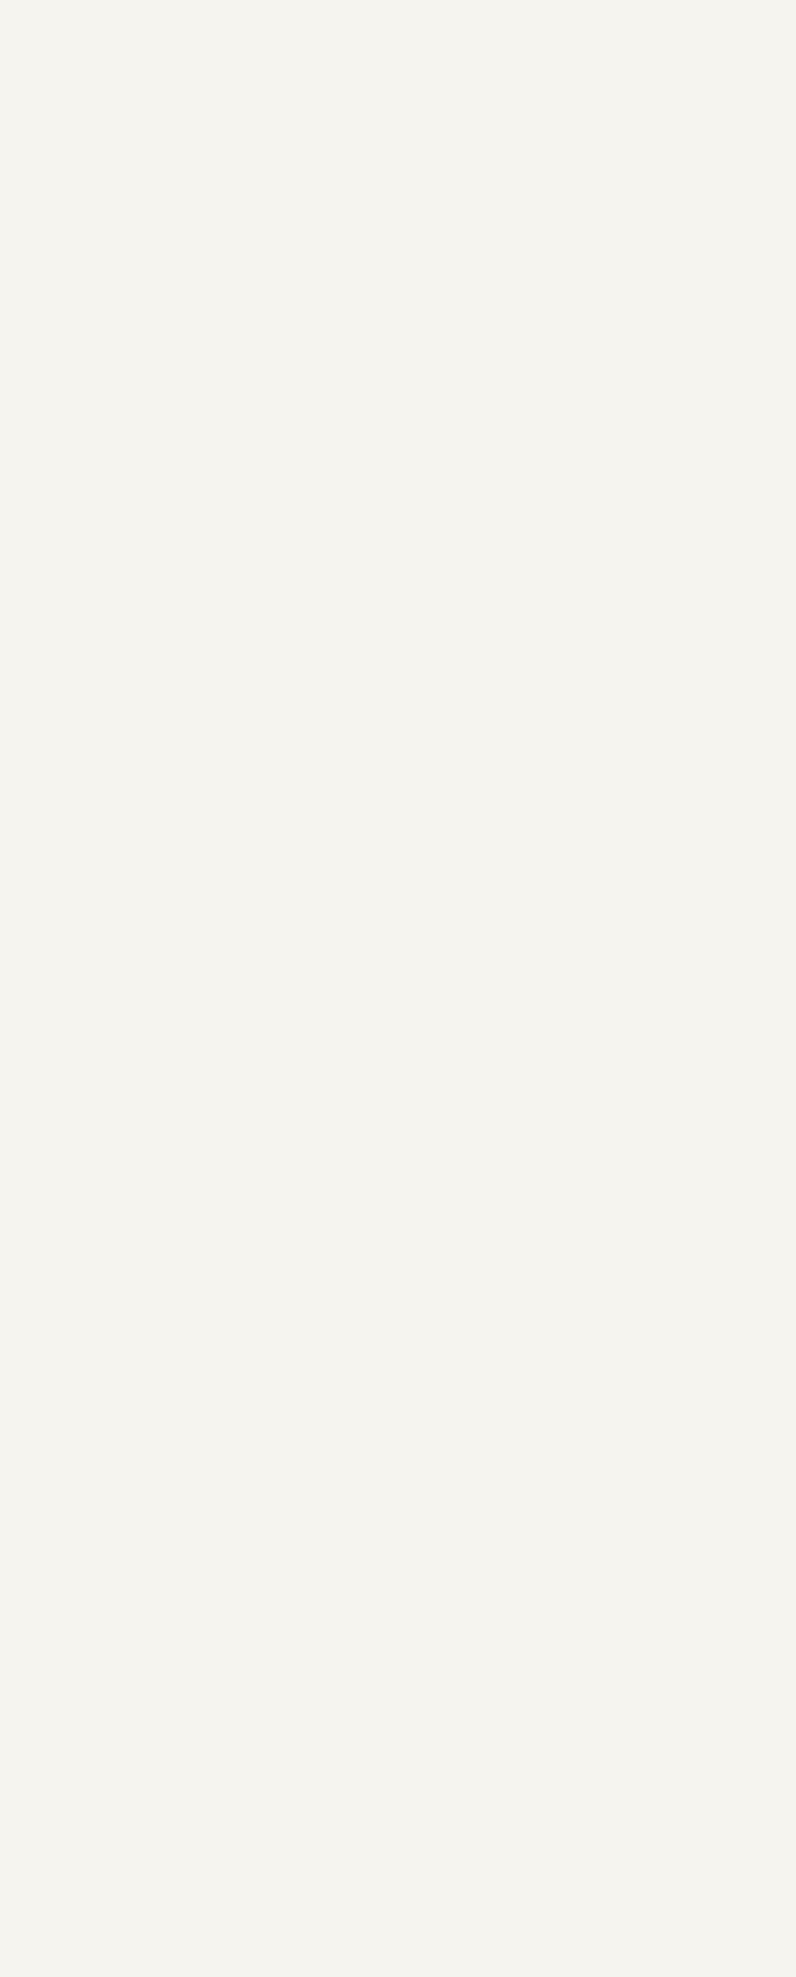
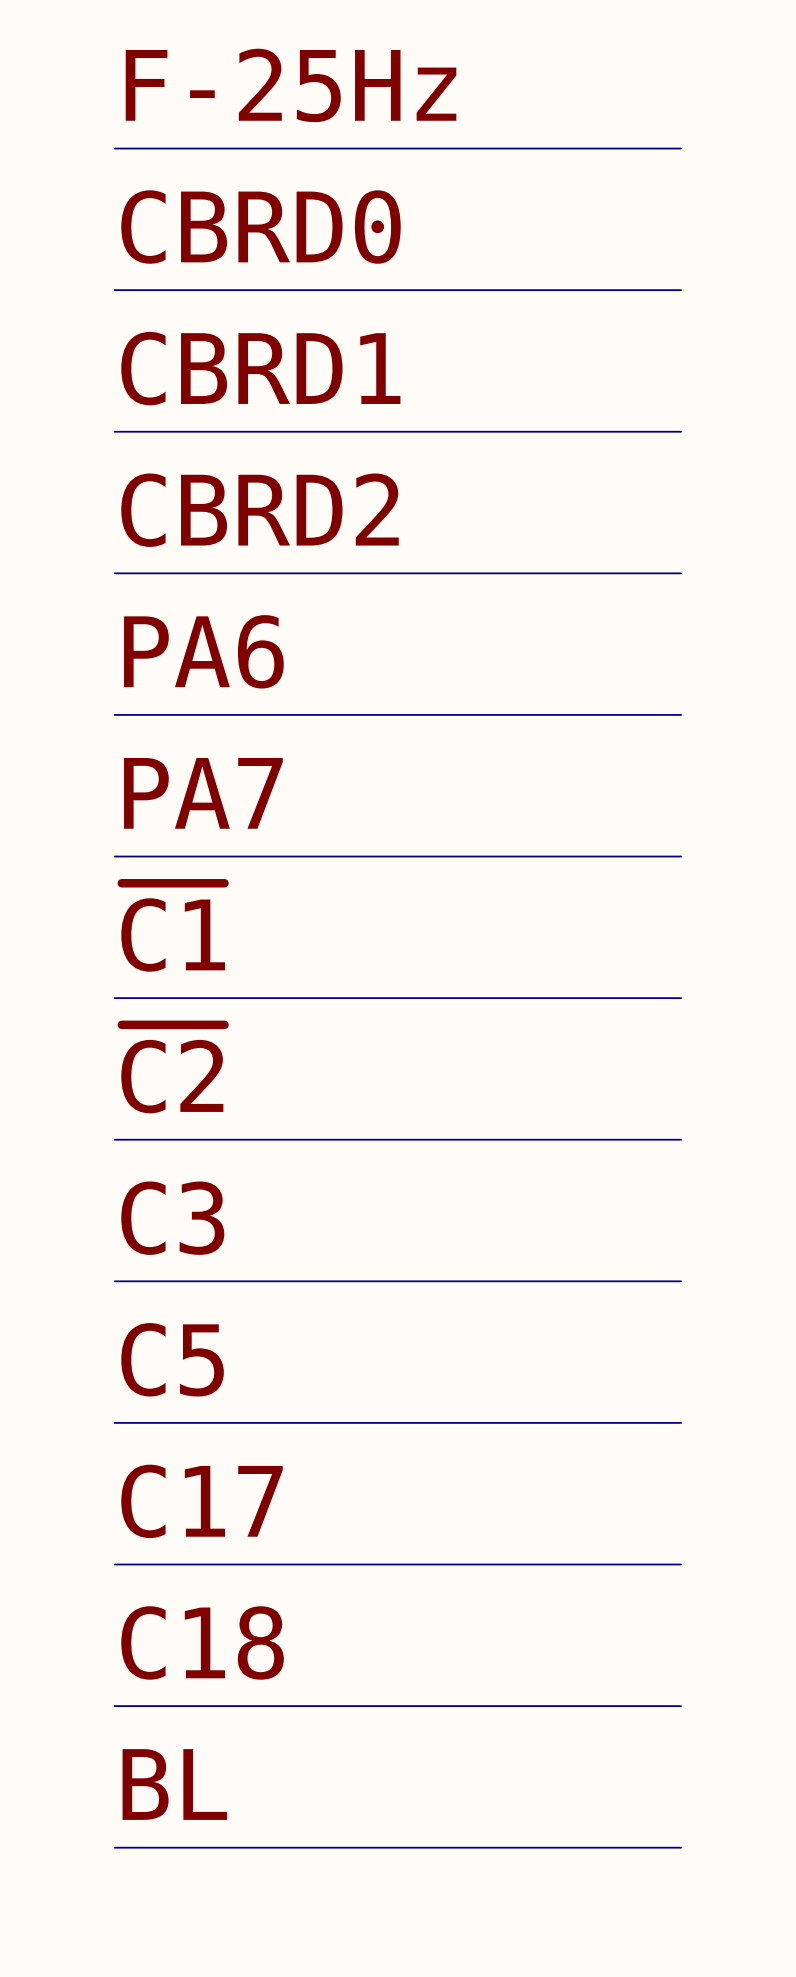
label: none -> F-25Hz (291, 85)
wire: none -> (114, 148) (681, 148)
label: none -> CBRD0 (260, 227)
wire: none -> (114, 290) (681, 290)
label: none -> CBRD1 (260, 368)
wire: none -> (114, 431) (681, 431)
label: none -> CBRD2 (260, 510)
wire: none -> (114, 573) (681, 573)
label: none -> PA6 (203, 651)
wire: none -> (114, 714) (681, 714)
label: none -> PA7 (203, 793)
wire: none -> (114, 856) (681, 856)
label: none -> ~{C1} (173, 927)
wire: none -> (114, 998) (681, 998)
label: none -> ~{C2} (172, 1069)
wire: none -> (114, 1139) (681, 1139)
label: none -> C3 (172, 1218)
wire: none -> (114, 1281) (681, 1281)
label: none -> C5 (172, 1359)
wire: none -> (114, 1422) (681, 1422)
label: none -> C17 (202, 1501)
wire: none -> (114, 1564) (681, 1564)
label: none -> C18 (202, 1642)
wire: none -> (114, 1706) (681, 1706)
label: none -> BL (174, 1784)
wire: none -> (114, 1847) (681, 1847)

